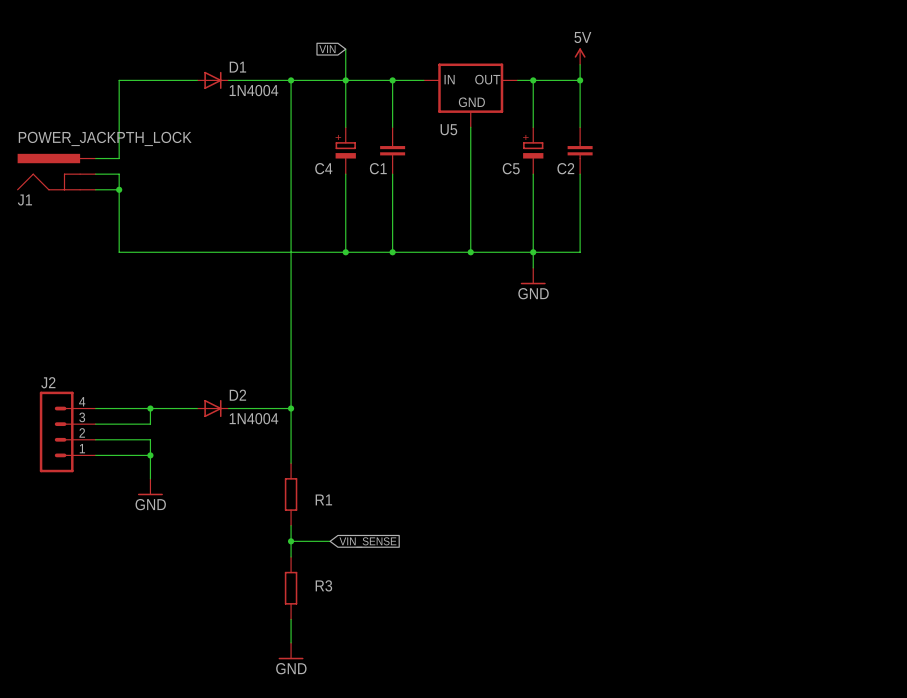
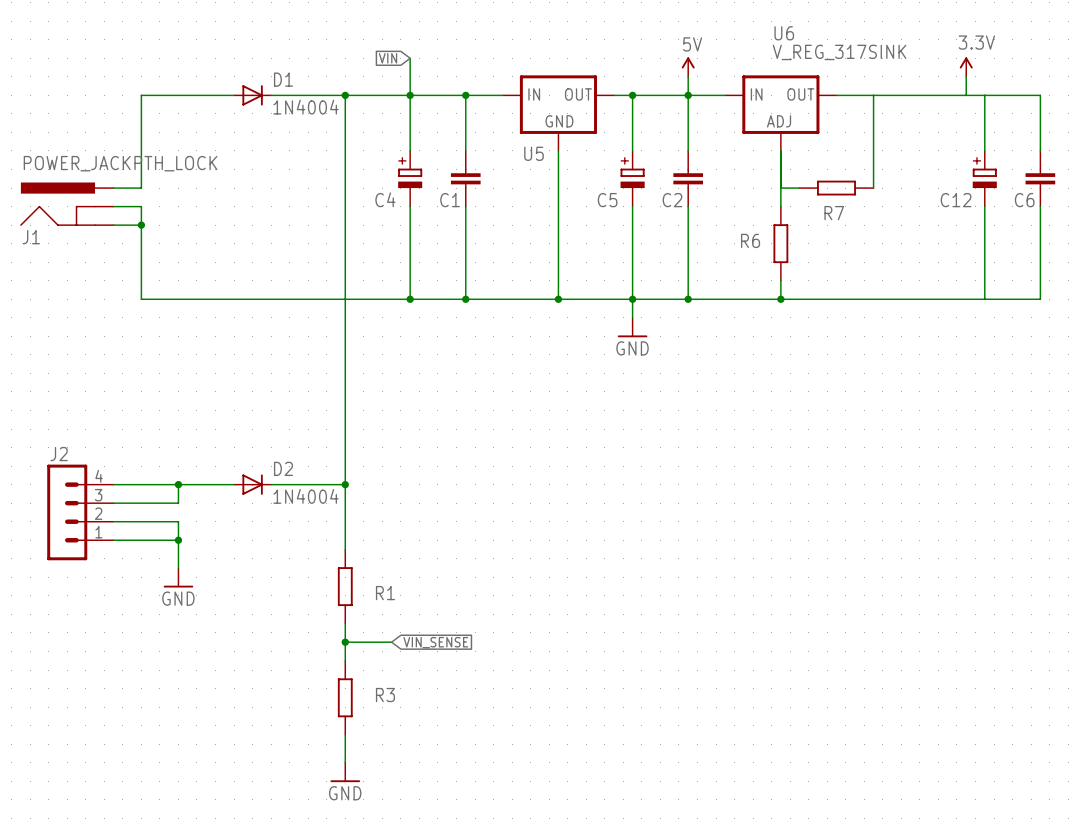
power symbol: none -> 3.3V (966, 67)
wire: none -> (966, 76) (966, 95)
wire: none -> (688, 95) (725, 95)
wire: none -> (836, 95) (1040, 95) (1040, 150)
wire: none -> (873, 95) (873, 188)
wire: none -> (984, 95) (984, 150)
U6: none -> V_REG_317SINK (780, 113)
wire: none -> (780, 150) (780, 206)
C12: none -> (984, 178)
C6: none -> (1040, 178)
wire: none -> (780, 188) (799, 188)
R7: none -> (836, 188)
wire: none -> (984, 206) (984, 299)
wire: none -> (1040, 206) (1040, 299) (688, 299)
R6: none -> (780, 243)
wire: none -> (780, 280) (780, 299)
junction: none -> (688, 299)
junction: none -> (780, 299)

